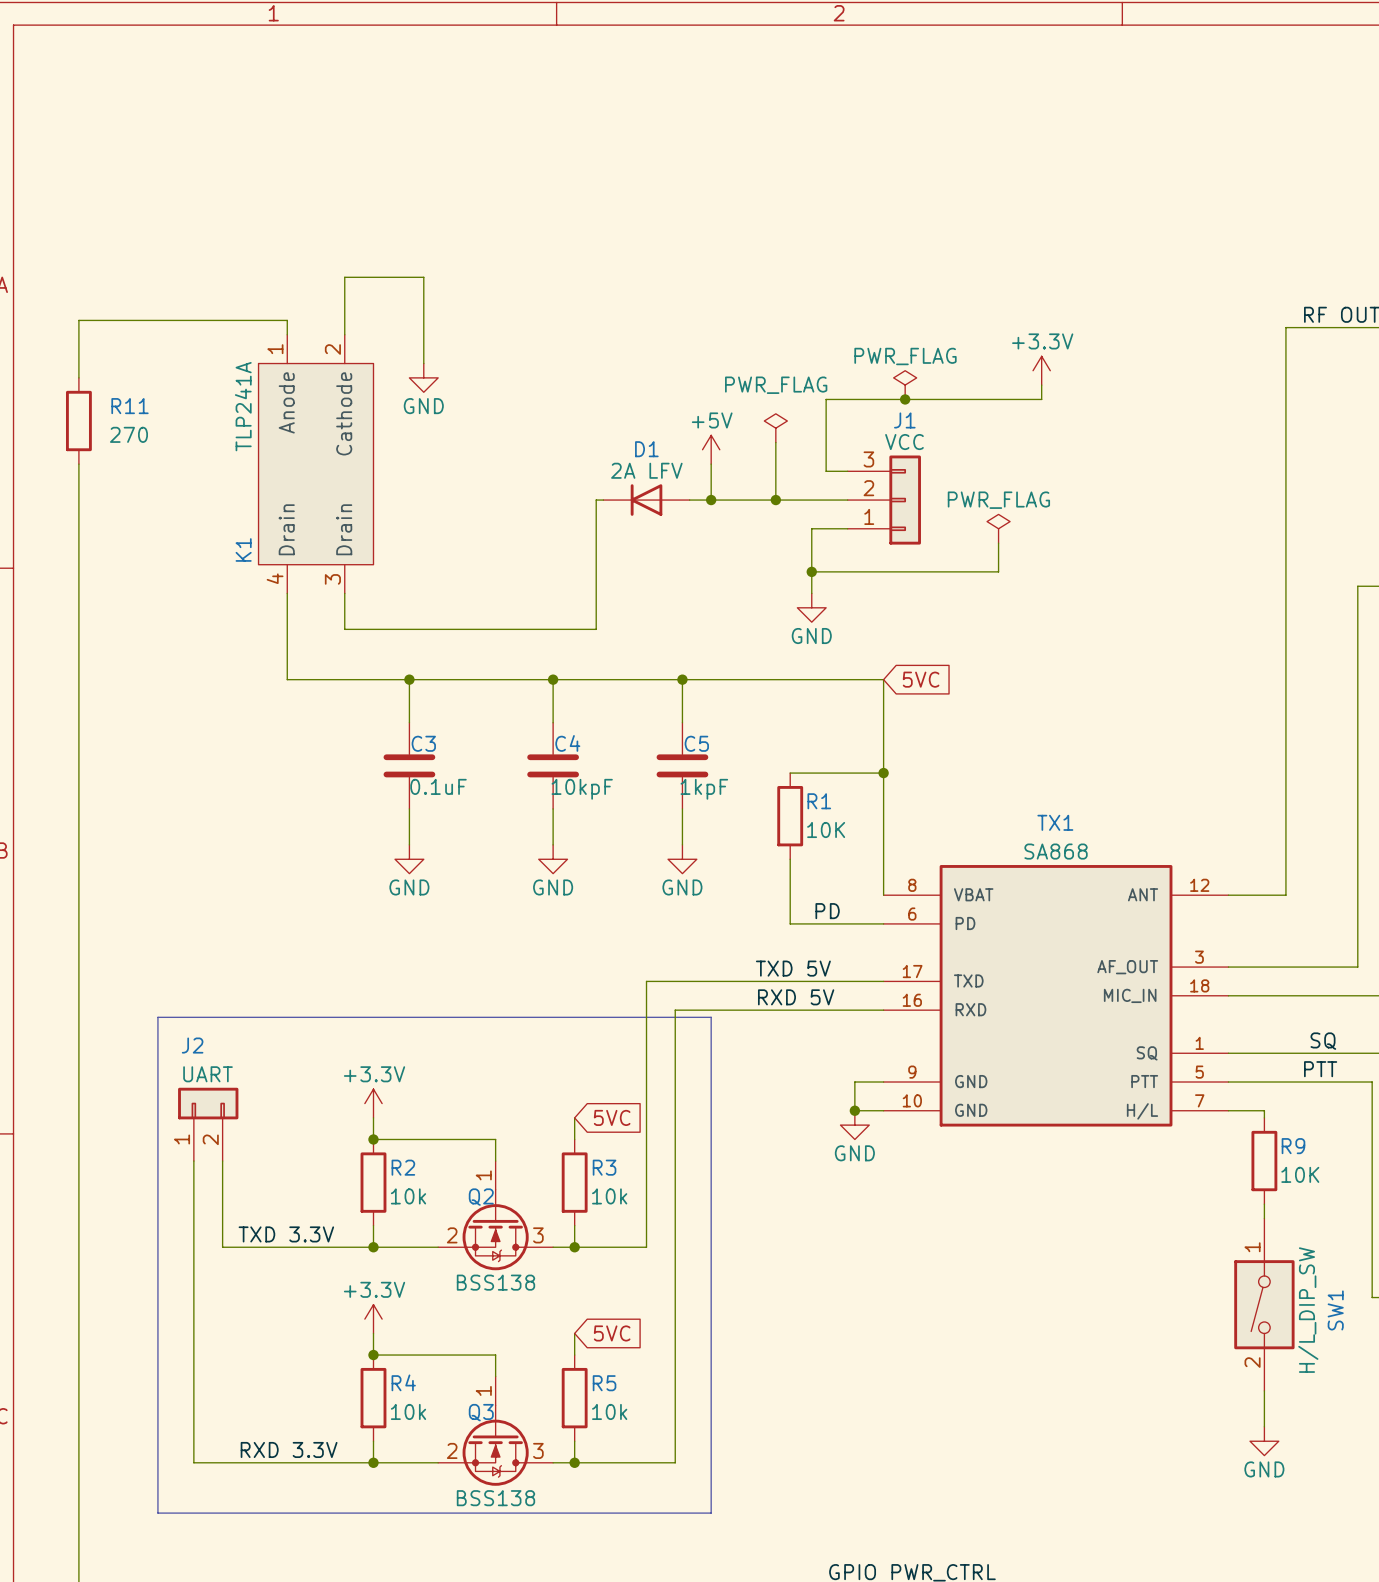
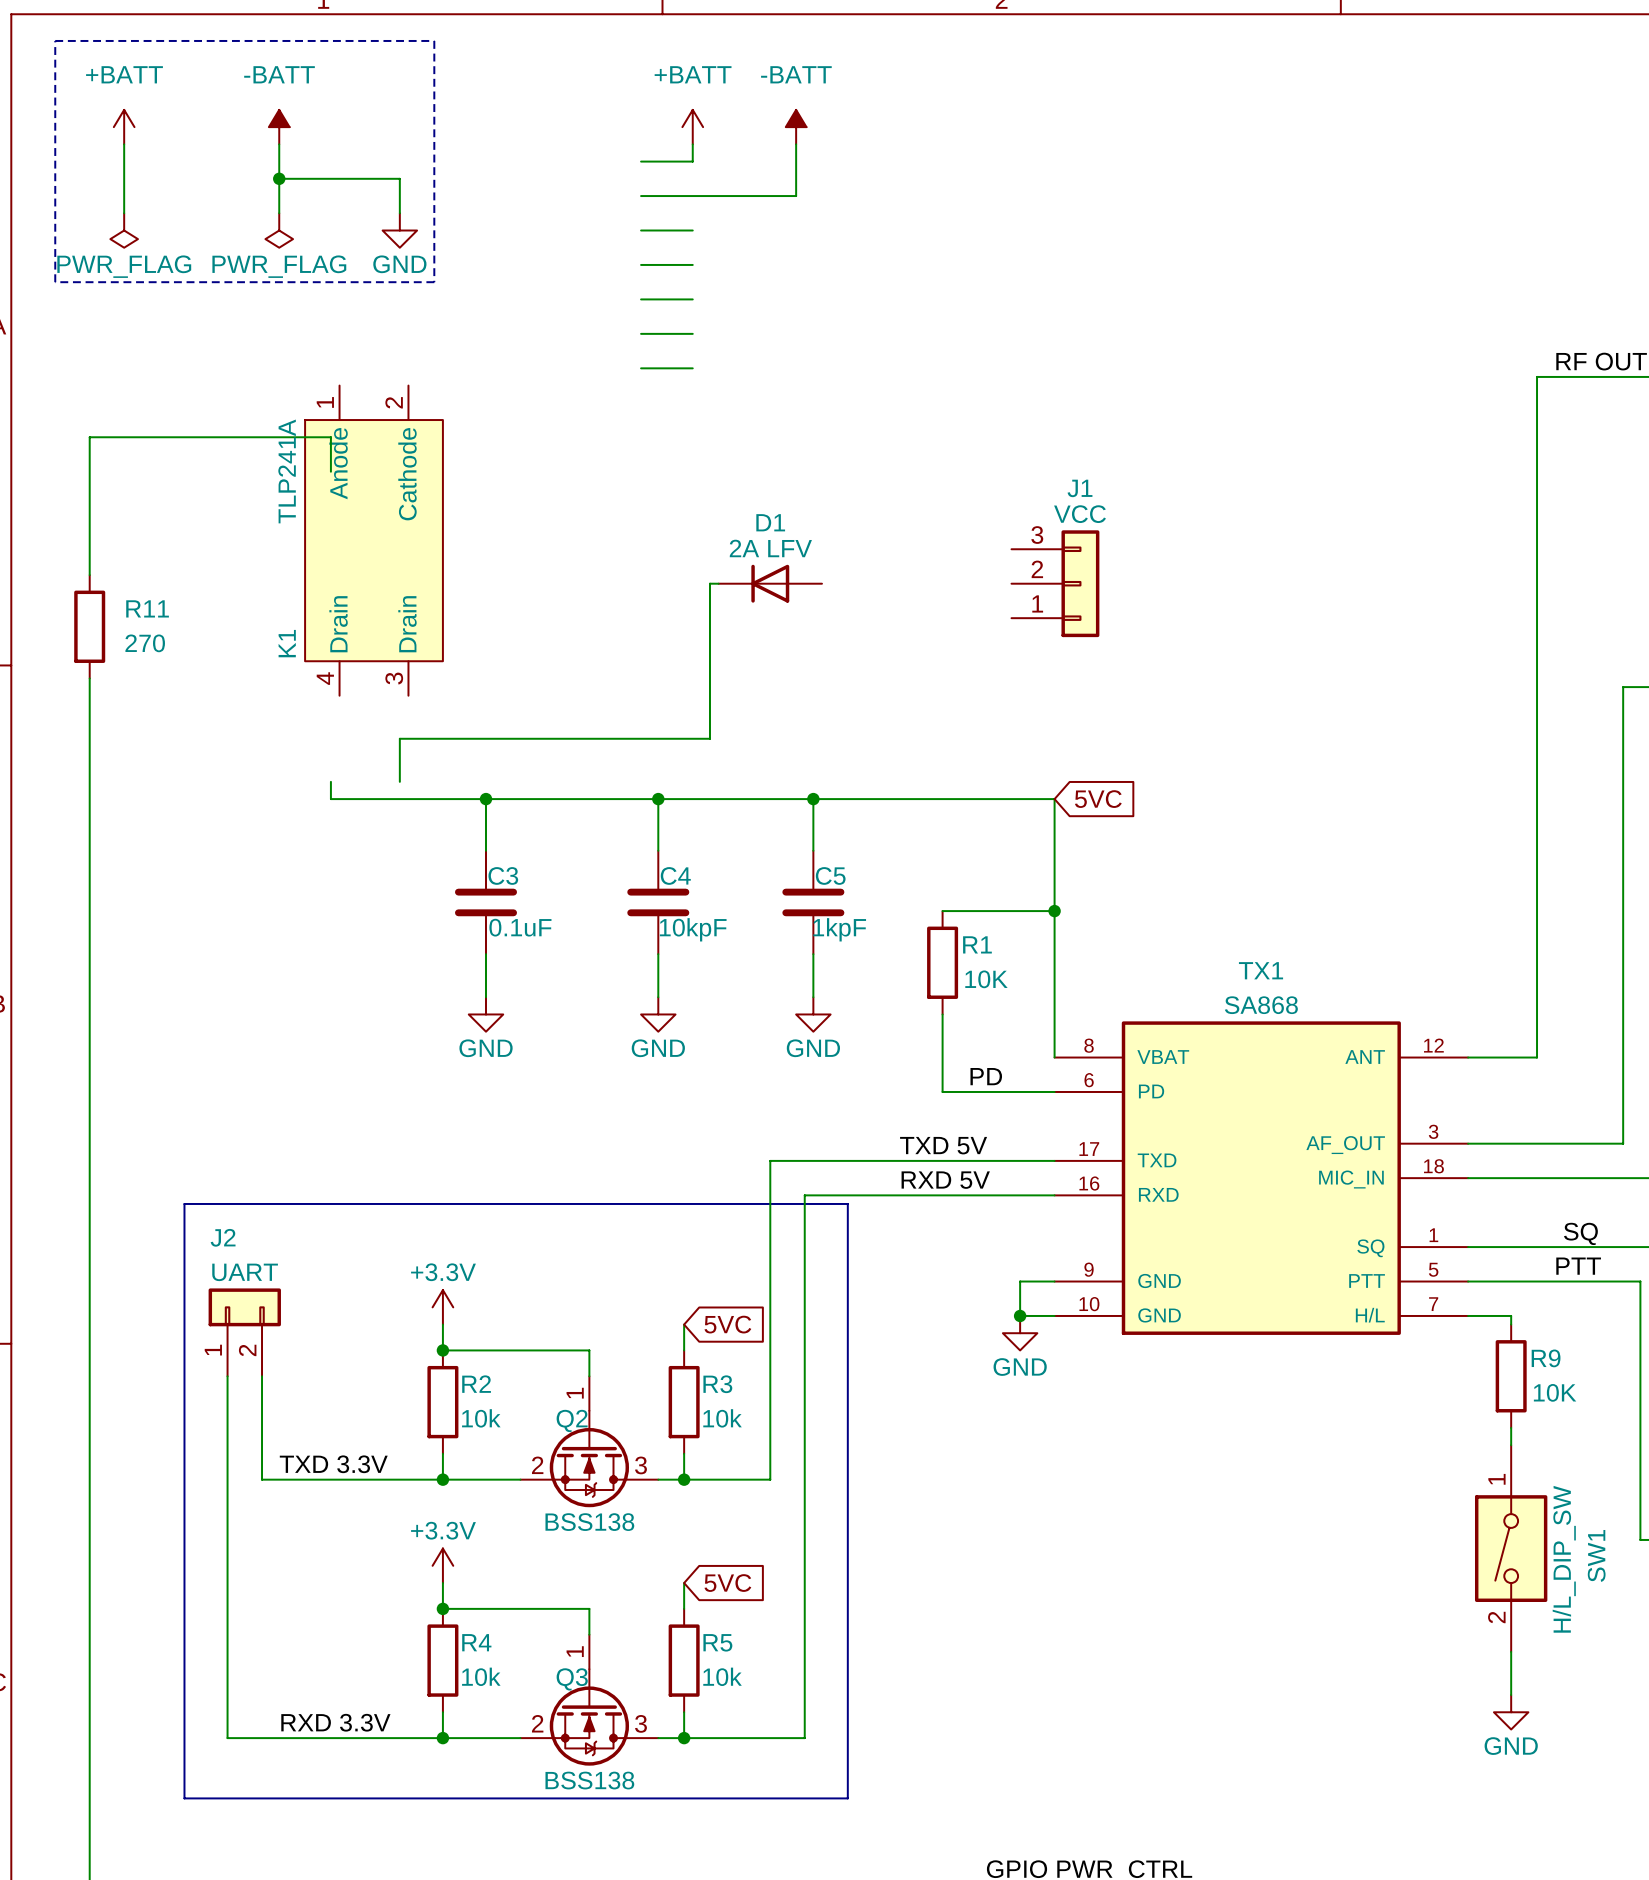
line: none -> (55, 40) (434, 40) (434, 282) (55, 282) (55, 40)
power symbol: none -> +BATT (124, 127)
power symbol: none -> -BATT (279, 127)
power symbol: none -> +BATT (692, 127)
power symbol: none -> -BATT (796, 127)
wire: none -> (124, 144) (124, 213)
wire: none -> (279, 144) (279, 213)
wire: none -> (692, 144) (692, 161) (641, 161)
wire: none -> (796, 144) (796, 196) (641, 196)
wire: none -> (279, 178) (399, 178) (399, 213)
junction: none -> (279, 178)
power symbol: none -> PWR_FLAG (124, 230)
power symbol: none -> PWR_FLAG (279, 230)
wire: none -> (641, 230) (692, 230)
wire: none -> (641, 264) (692, 264)
wire: none -> (641, 299) (692, 299)
wire: none -> (641, 333) (692, 333)
wire: none -> (641, 368) (692, 368)
wire: (287, 334) (287, 320) (78, 320) (78, 377) -> none
wire: (344, 334) (344, 277) (423, 277) (423, 363) -> none
power symbol: +3.3V (1041, 370) -> none
power symbol position: GND (423, 377) -> GND (399, 230)
power symbol: PWR_FLAG (905, 385) -> none
wire: (1041, 385) (1041, 399) (826, 399) (826, 471) (847, 471) -> none
junction: (905, 399) -> none
wire: none -> (330, 471) (330, 437) (89, 437) (89, 540)
R11 position: (78, 421) -> (89, 626)
power symbol: PWR_FLAG (775, 428) -> none
wire: (775, 442) (775, 500) -> none
power symbol: +5V (711, 449) -> none
wire: (711, 464) (711, 500) -> none
wire: (78, 492) (78, 579) -> none
wire: (689, 500) (847, 500) -> none
junction: (711, 500) -> none
junction: (775, 500) -> none
wire: (847, 528) (811, 528) (811, 593) -> none
power symbol: PWR_FLAG (998, 528) -> none
wire: (998, 543) (998, 571) (811, 571) -> none
junction: (811, 571) -> none
wire: (287, 593) (287, 679) -> (330, 781) (330, 799) (339, 799)
wire: (344, 593) (344, 629) -> (399, 781) (399, 738) (408, 738)
power symbol: GND (811, 607) -> none

